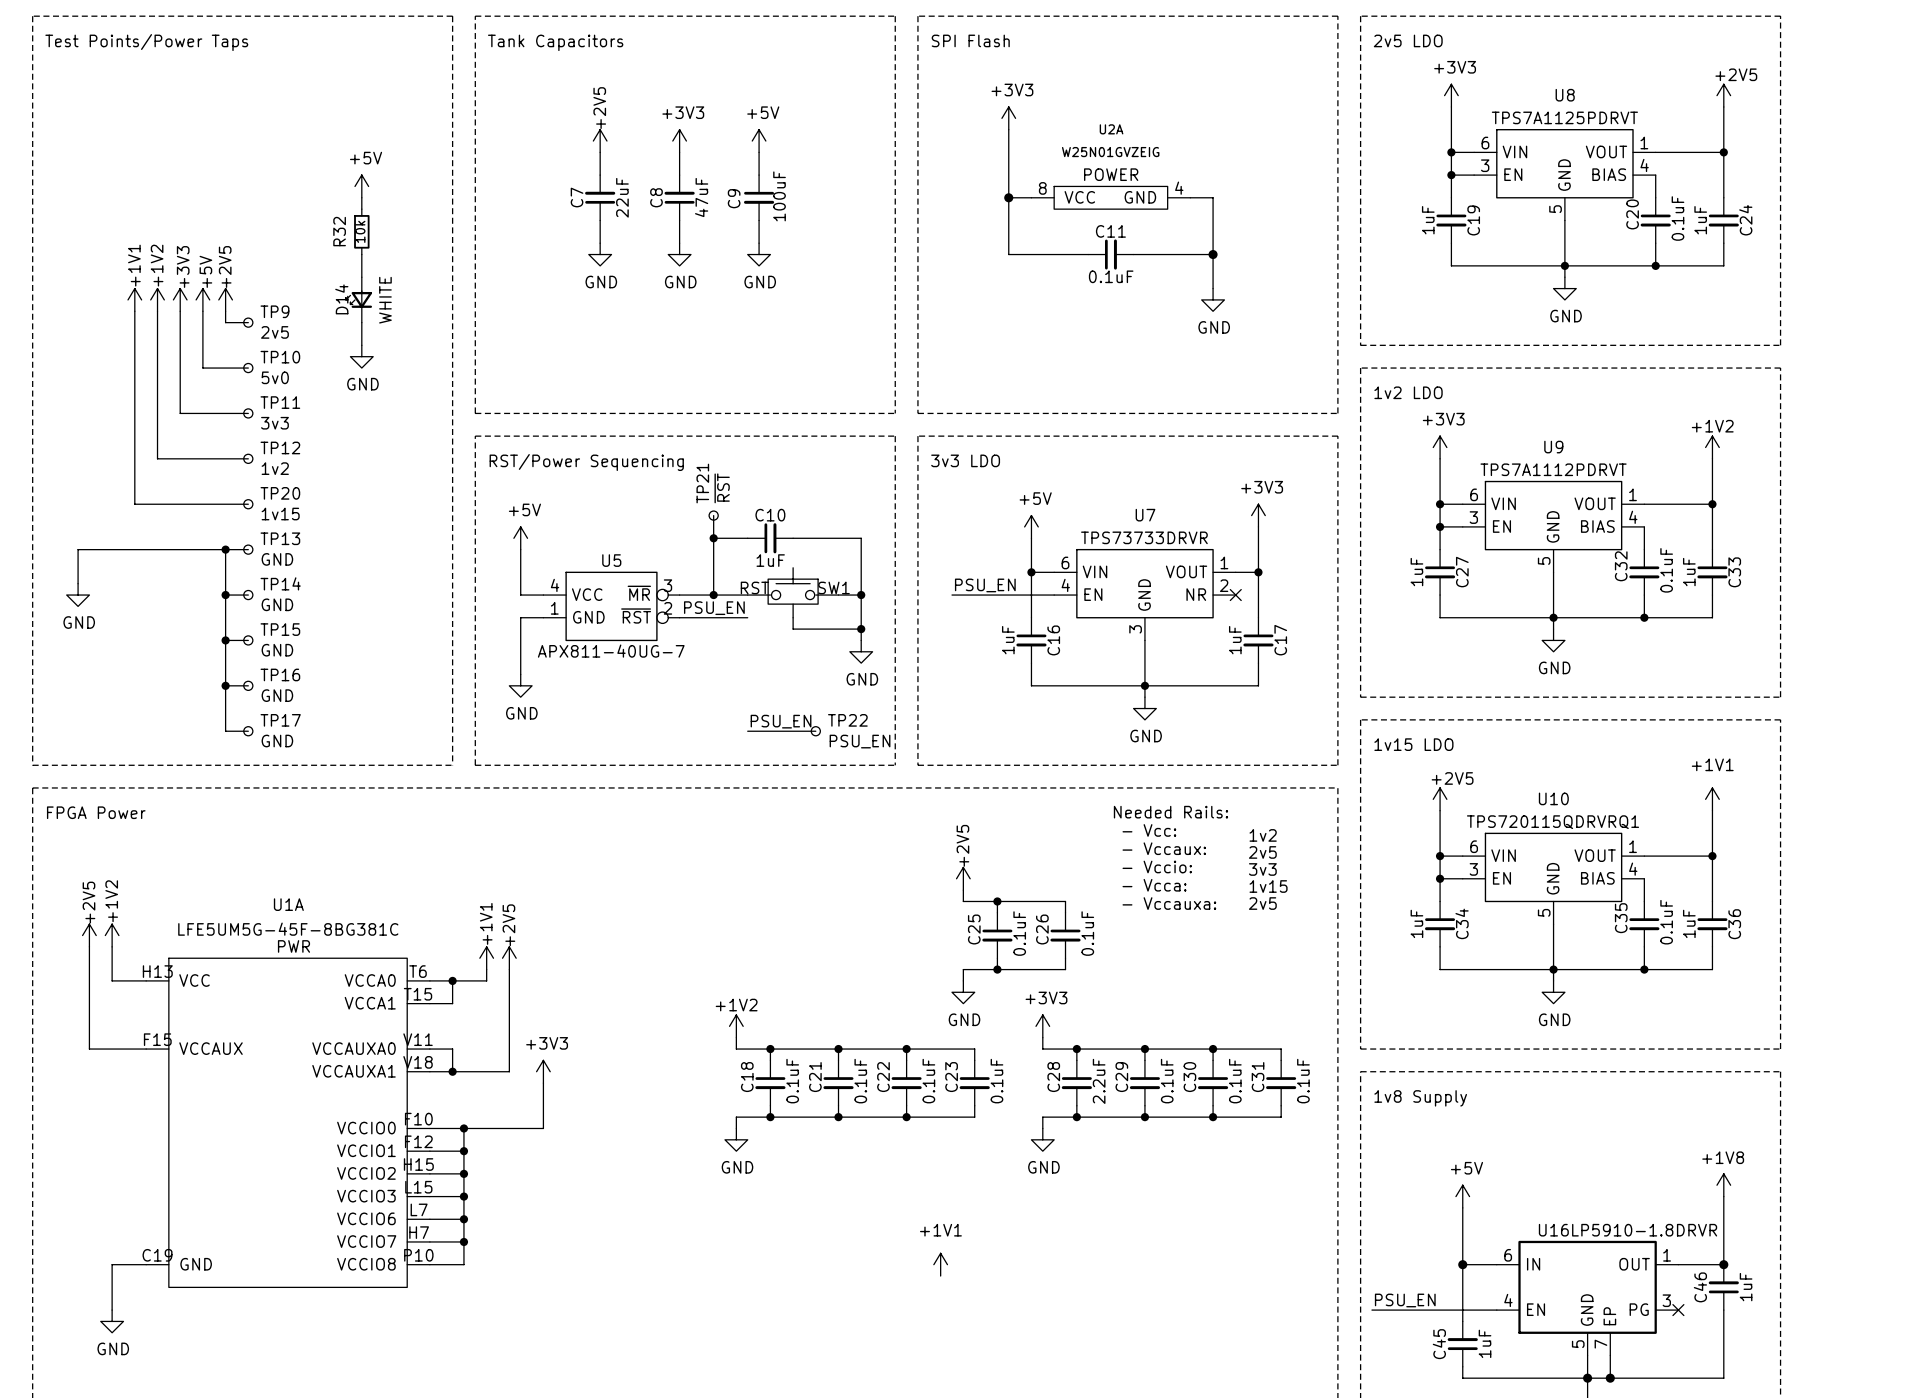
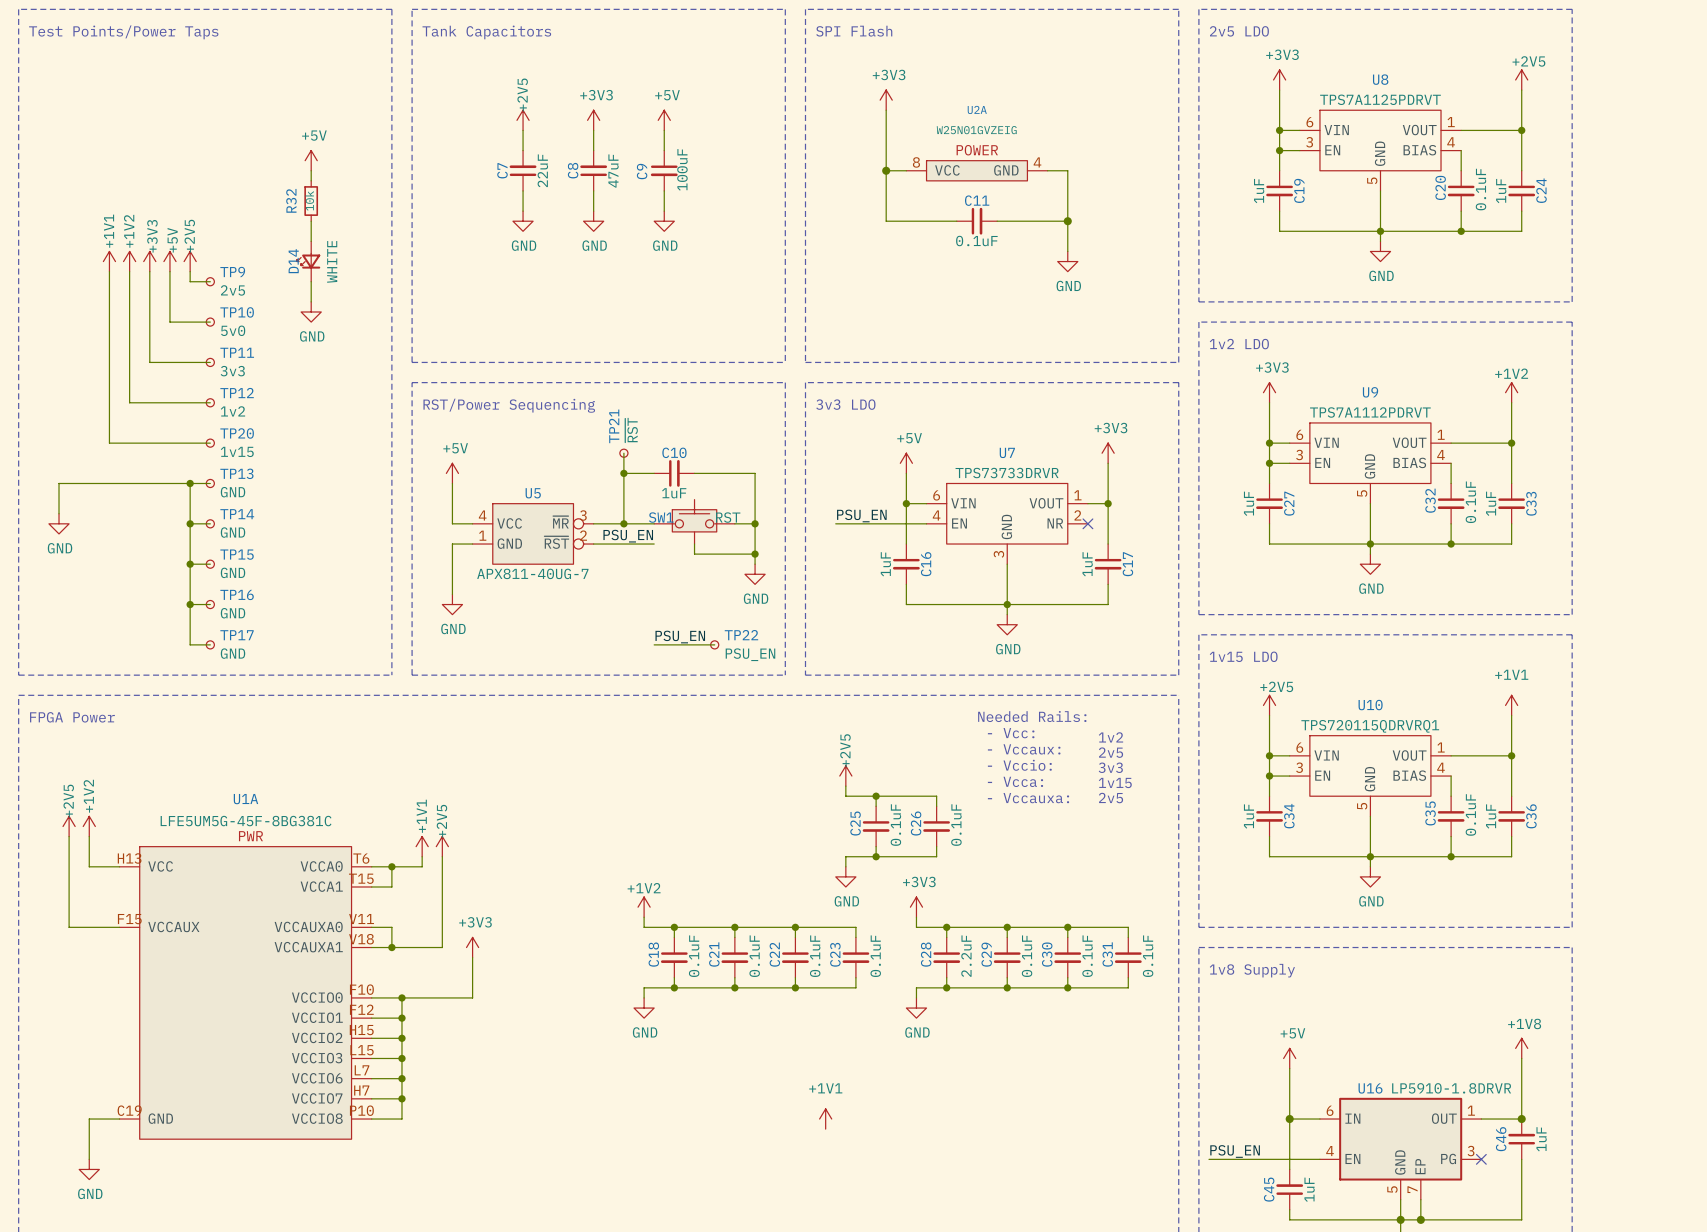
SW1 value position: RST (754, 587) -> RST (728, 517)
SW1 name position: SW1 (834, 587) -> SW1 (661, 517)

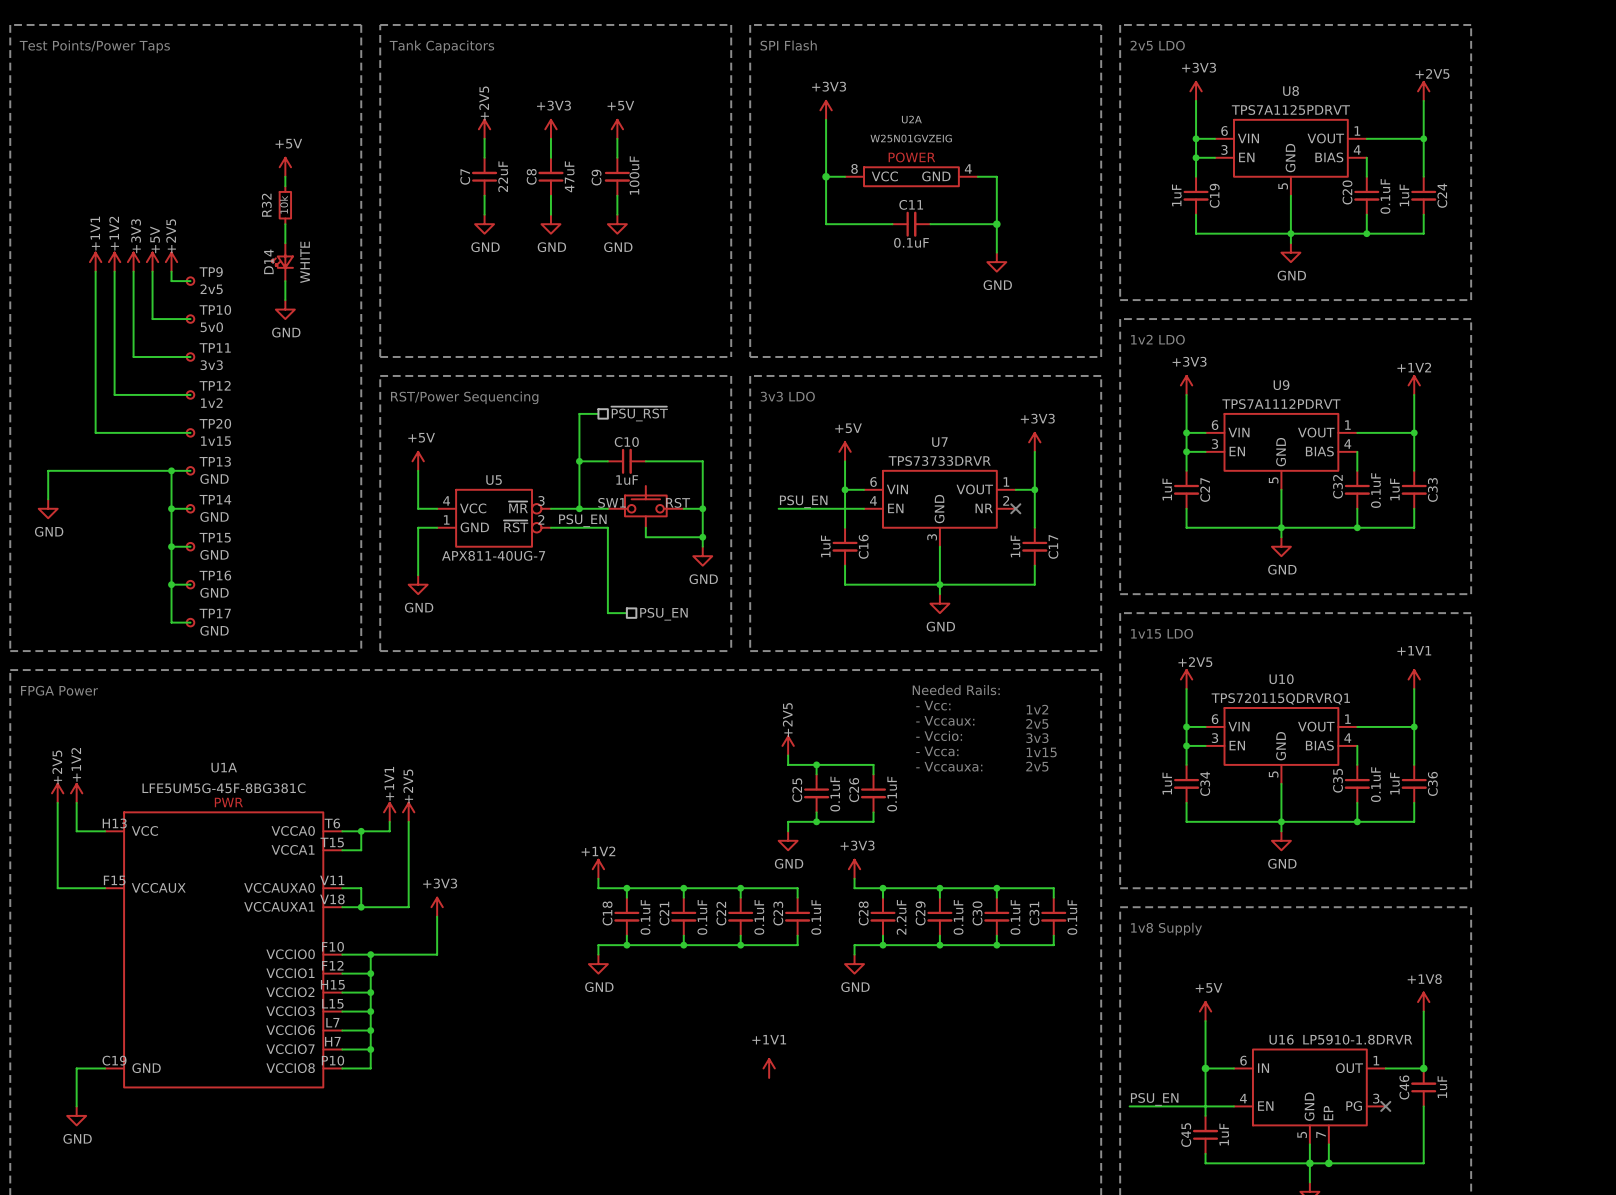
wire: none -> (598, 413) (579, 413) (579, 442)
hierarchical label: none -> ~{PSU_RST} (639, 414)
TP21: ~{RST} (623, 453) -> none
wire: none -> (607, 527) (607, 613) (626, 613)
hierarchical label: none -> PSU_EN (663, 614)
label: PSU_EN (680, 637) -> none
wire: (654, 644) (714, 644) -> none
TP22: PSU_EN (714, 644) -> none

